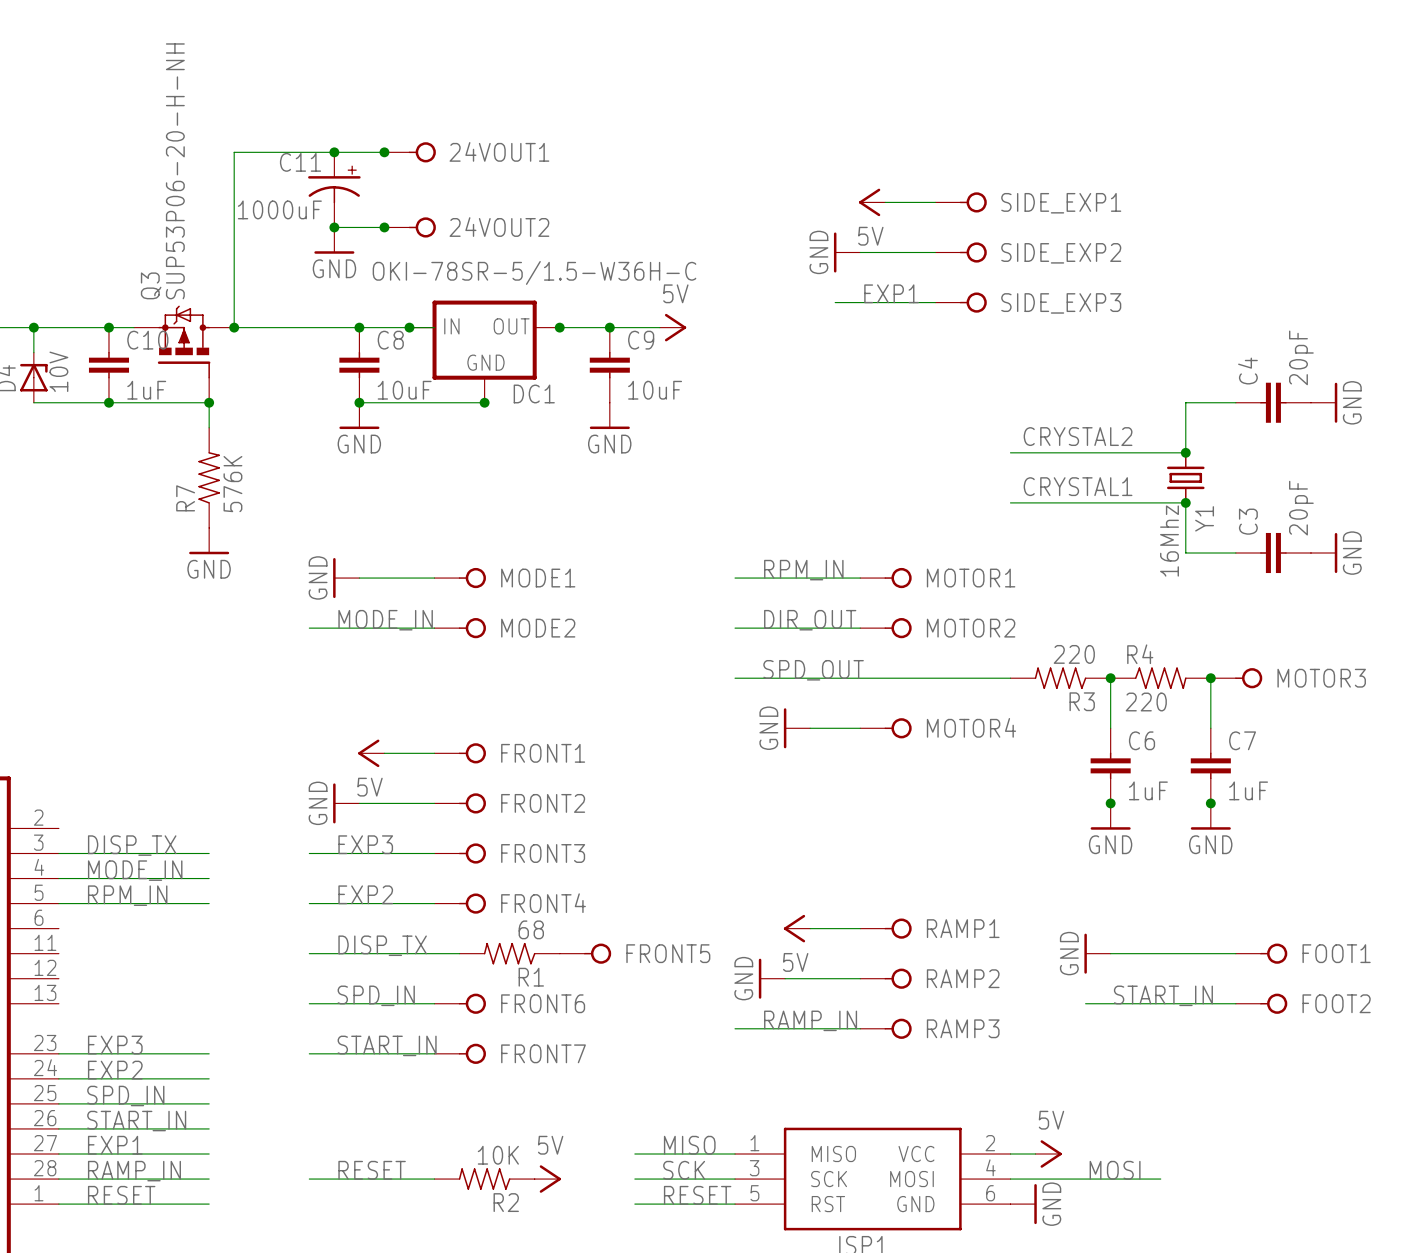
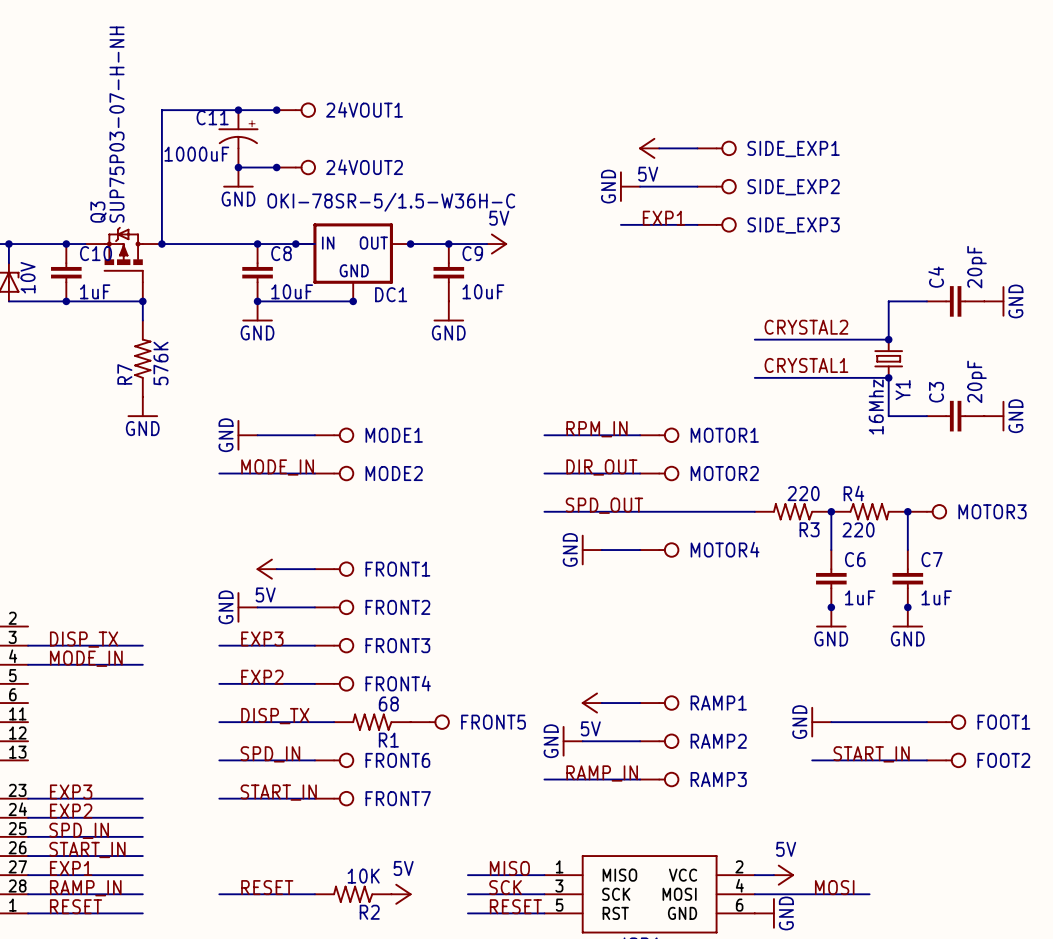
Q3 value: SUP53P06-20-H-NH (175, 171) -> SUP75P03-07-H-NH (117, 124)
label: RPM_IN (127, 895) -> none
wire: (58, 903) (209, 903) -> none

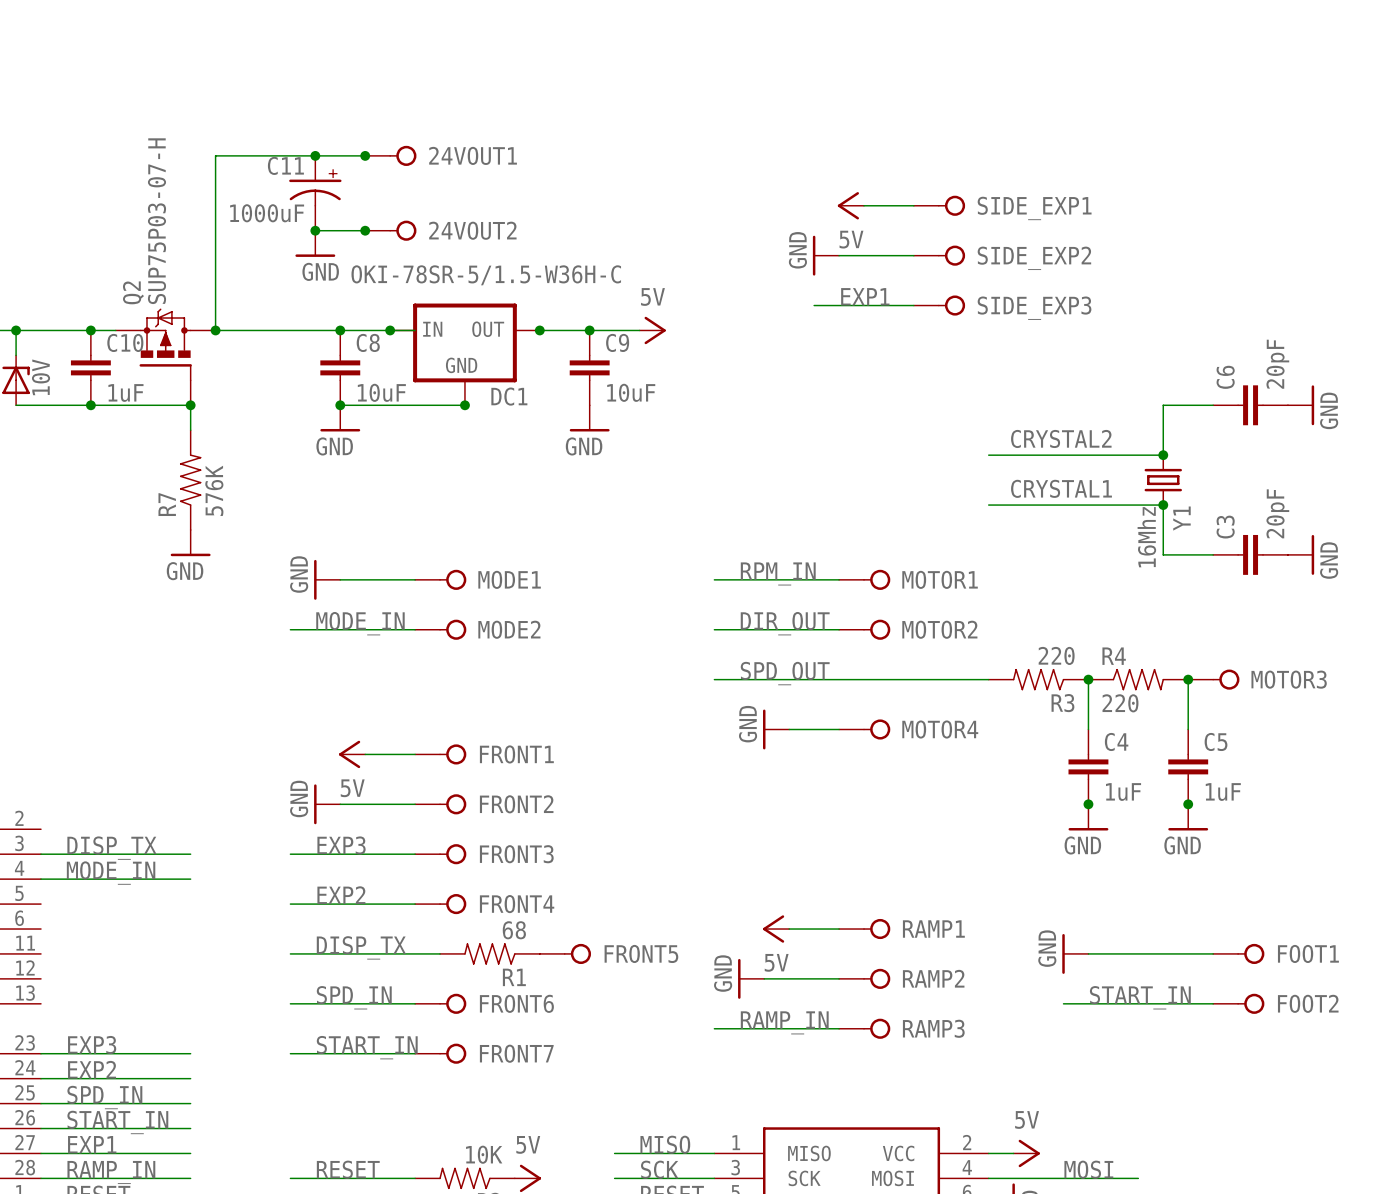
Q3 value: SUP75P03-07-H-NH (117, 124) -> SUP75P03-07-H (156, 221)
Q3 name: Q3 (98, 212) -> Q2 (133, 292)
C4 name: C4 (936, 277) -> C6 (1225, 377)
C6 name: C6 (855, 559) -> C4 (1116, 741)
C7 name: C7 (932, 559) -> C5 (1216, 741)

